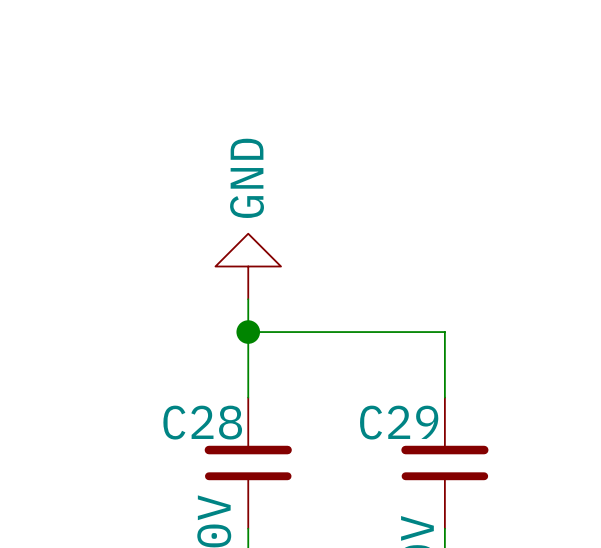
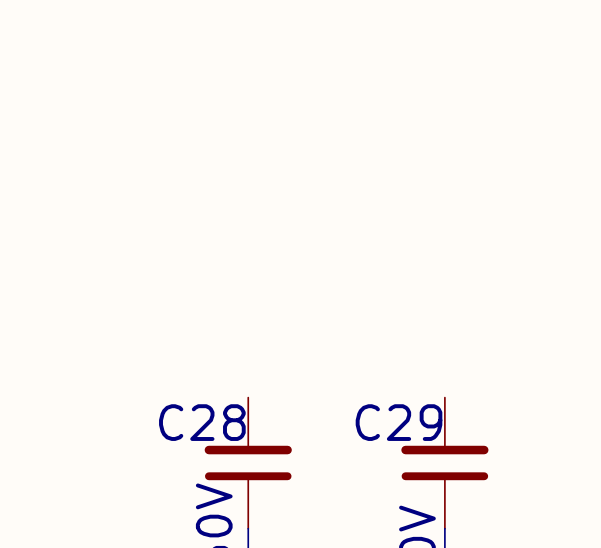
power symbol: GND (248, 266) -> none
wire: (248, 299) (248, 397) -> none
wire: (248, 332) (444, 332) (444, 397) -> none
junction: (248, 332) -> none

